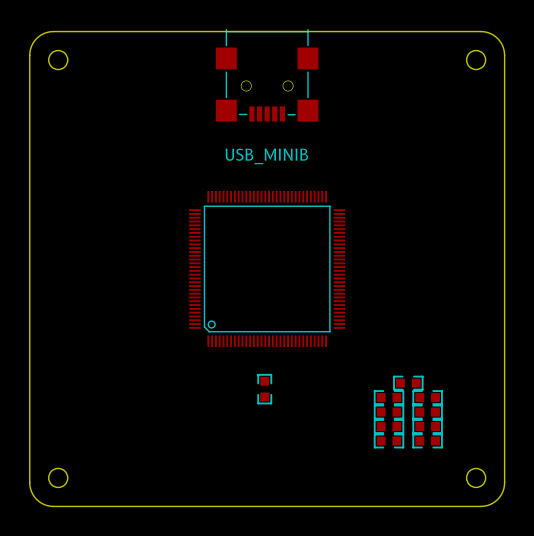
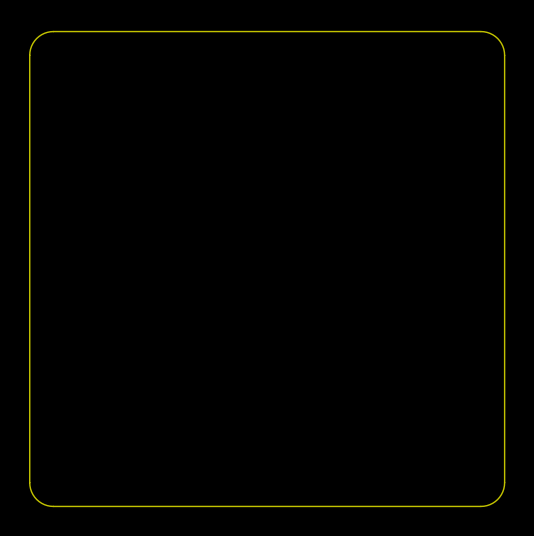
round board edge: [48, 49, 69, 71] -> none
round board edge: [465, 49, 487, 71] -> none
part: USB_MINIB (267, 75) -> none
part: (267, 268) -> none
part: (408, 383) -> none
part: (264, 389) -> none
part: (389, 397) -> none
part: (427, 397) -> none
part: (389, 412) -> none
part: (427, 412) -> none
part: (389, 426) -> none
part: (427, 426) -> none
part: (389, 441) -> none
part: (427, 441) -> none
round board edge: [48, 467, 69, 489] -> none
round board edge: [465, 467, 487, 489] -> none

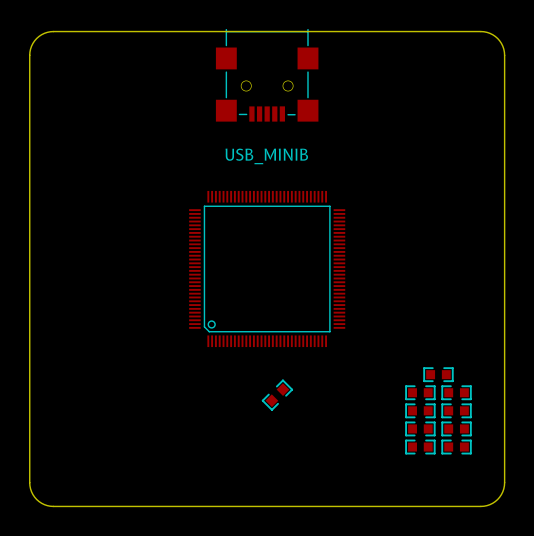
part: none -> USB_MINIB (267, 75)
part: none -> (267, 268)
part: none -> (438, 374)
part: none -> (420, 392)
part: none -> (456, 392)
part: none -> (277, 395)
part: none -> (420, 410)
part: none -> (456, 410)
part: none -> (420, 428)
part: none -> (456, 428)
part: none -> (420, 447)
part: none -> (456, 447)

